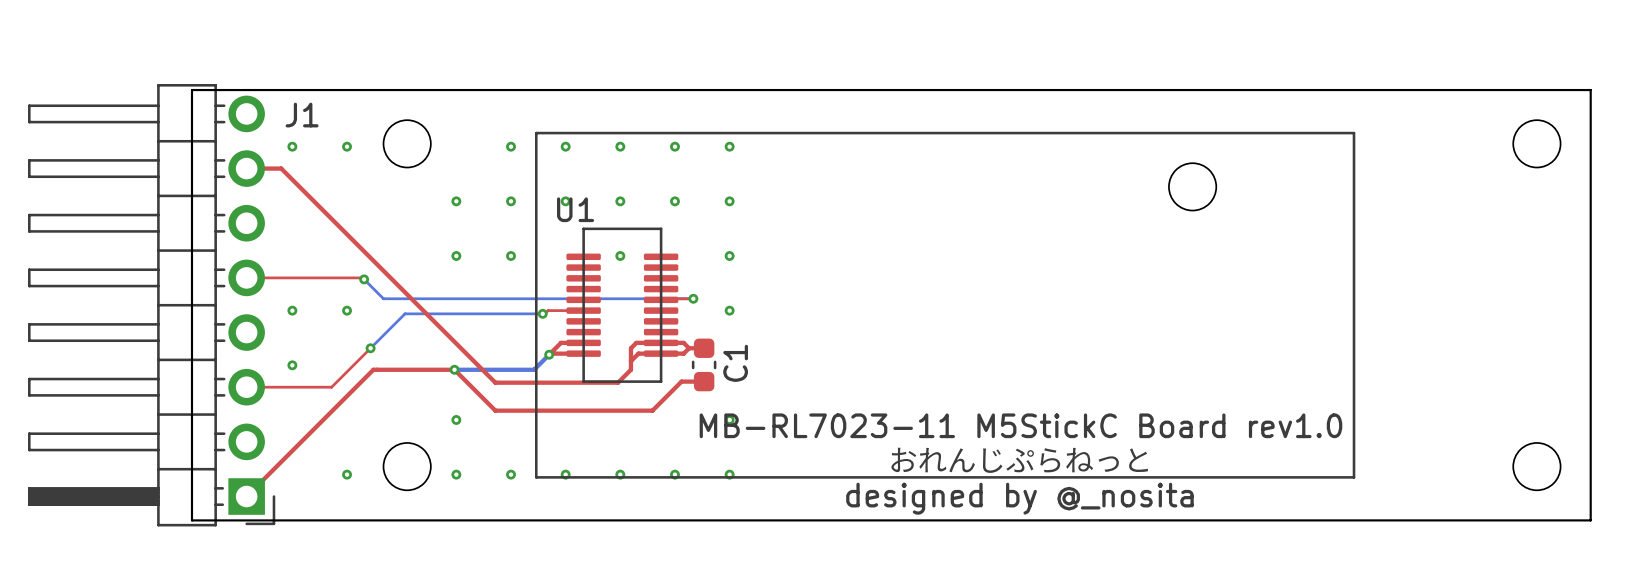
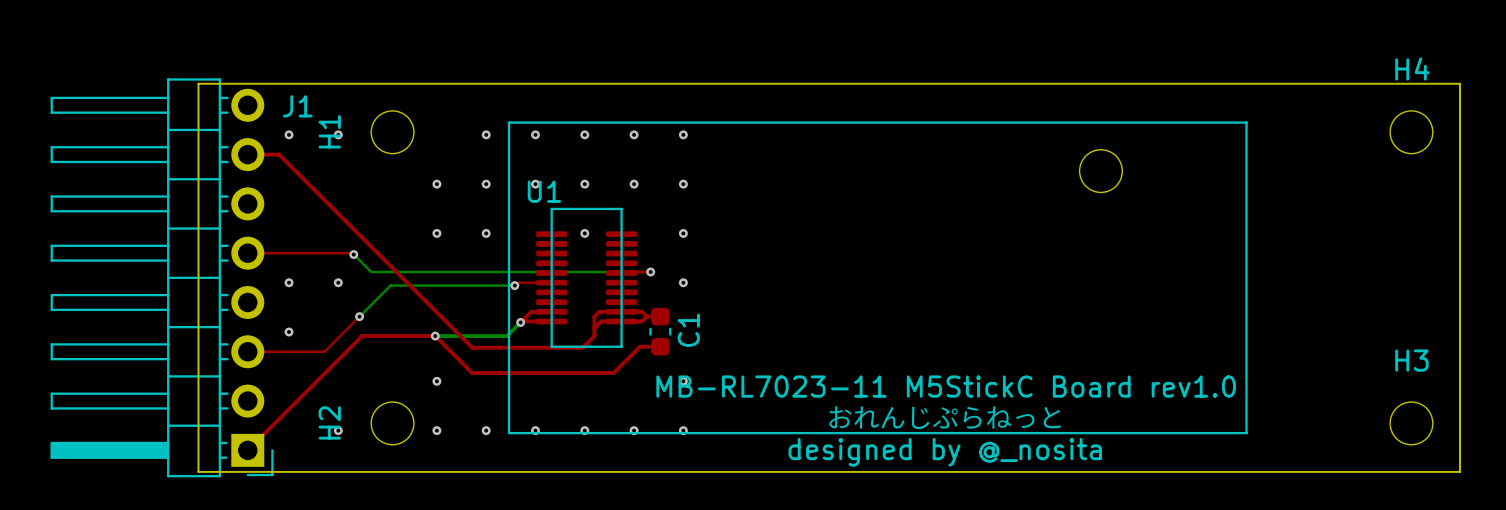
H4 name: none -> H4 (1412, 68)
H1 name: none -> H1 (329, 131)
H3 name: none -> H3 (1411, 360)
H2 name: none -> H2 (329, 422)

